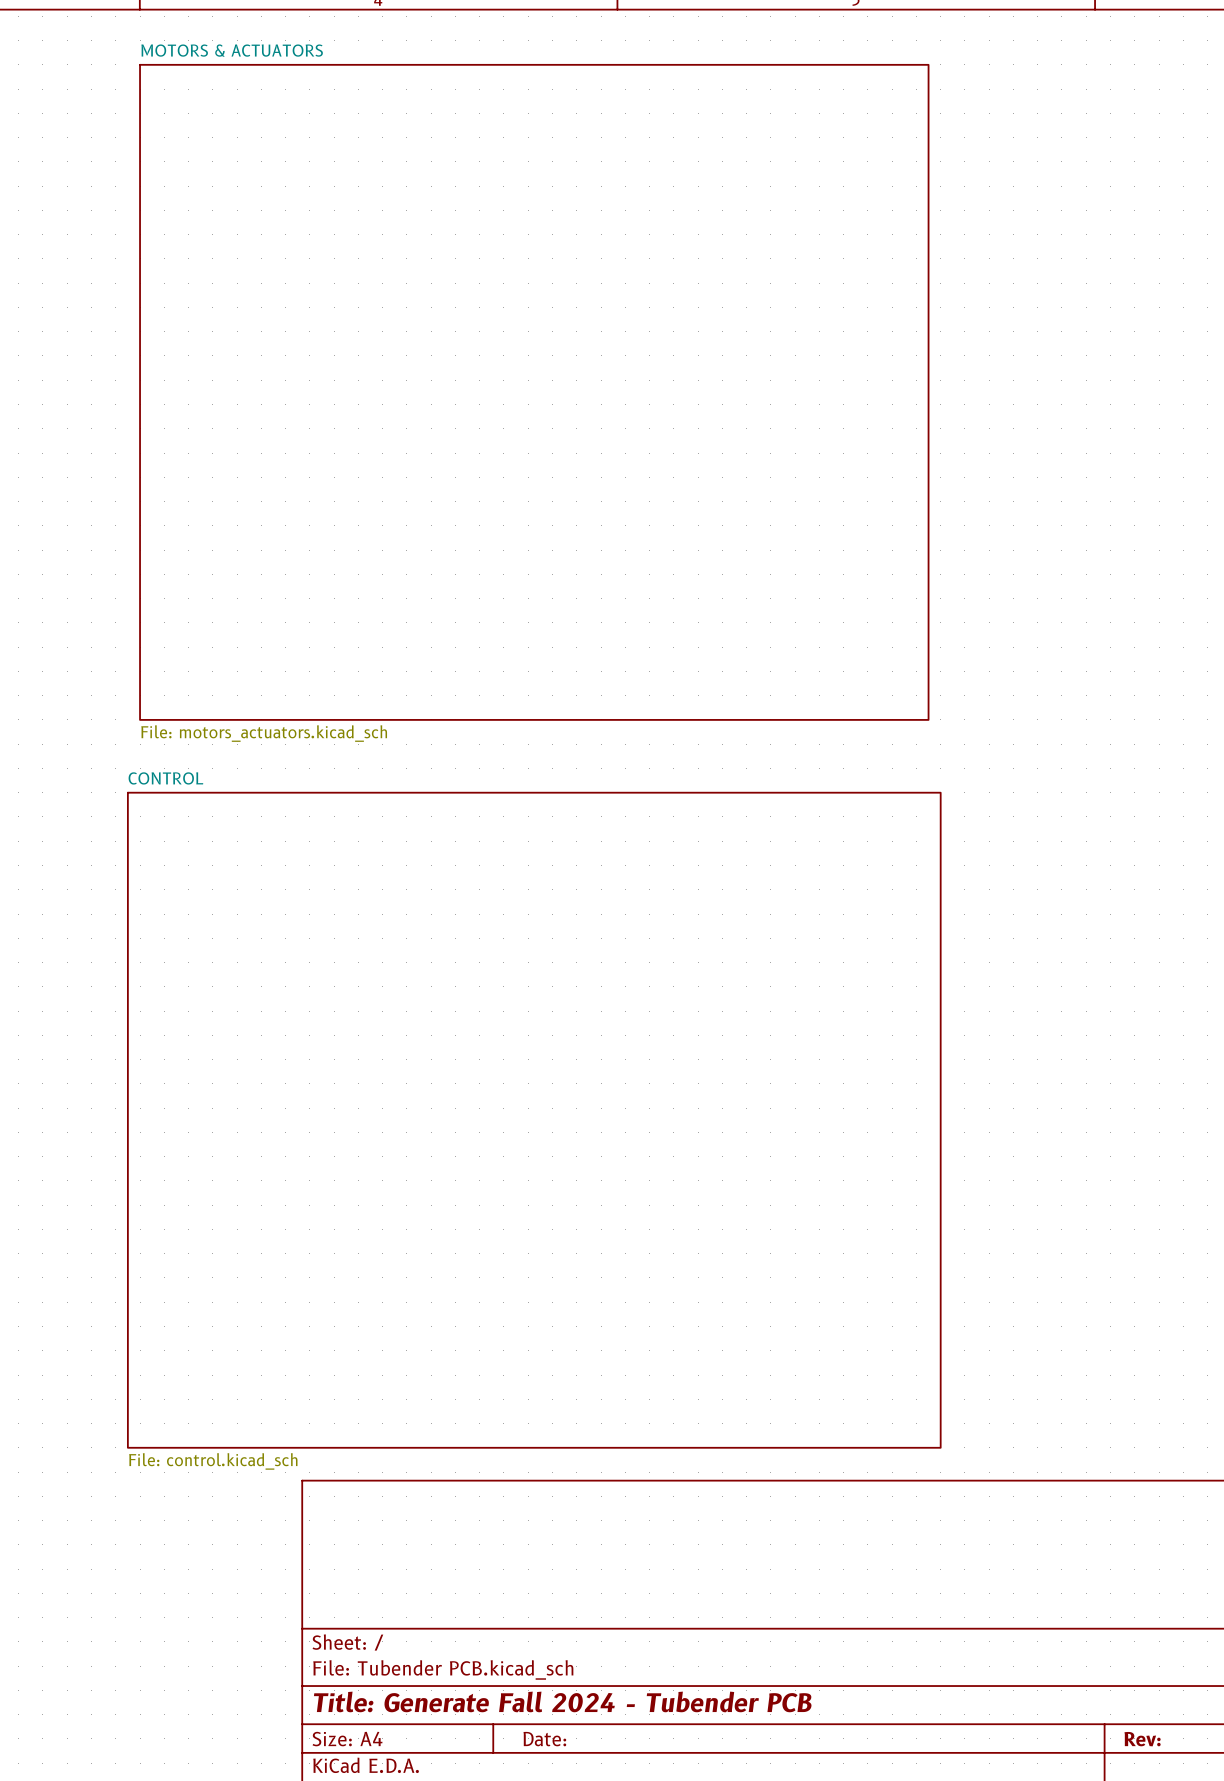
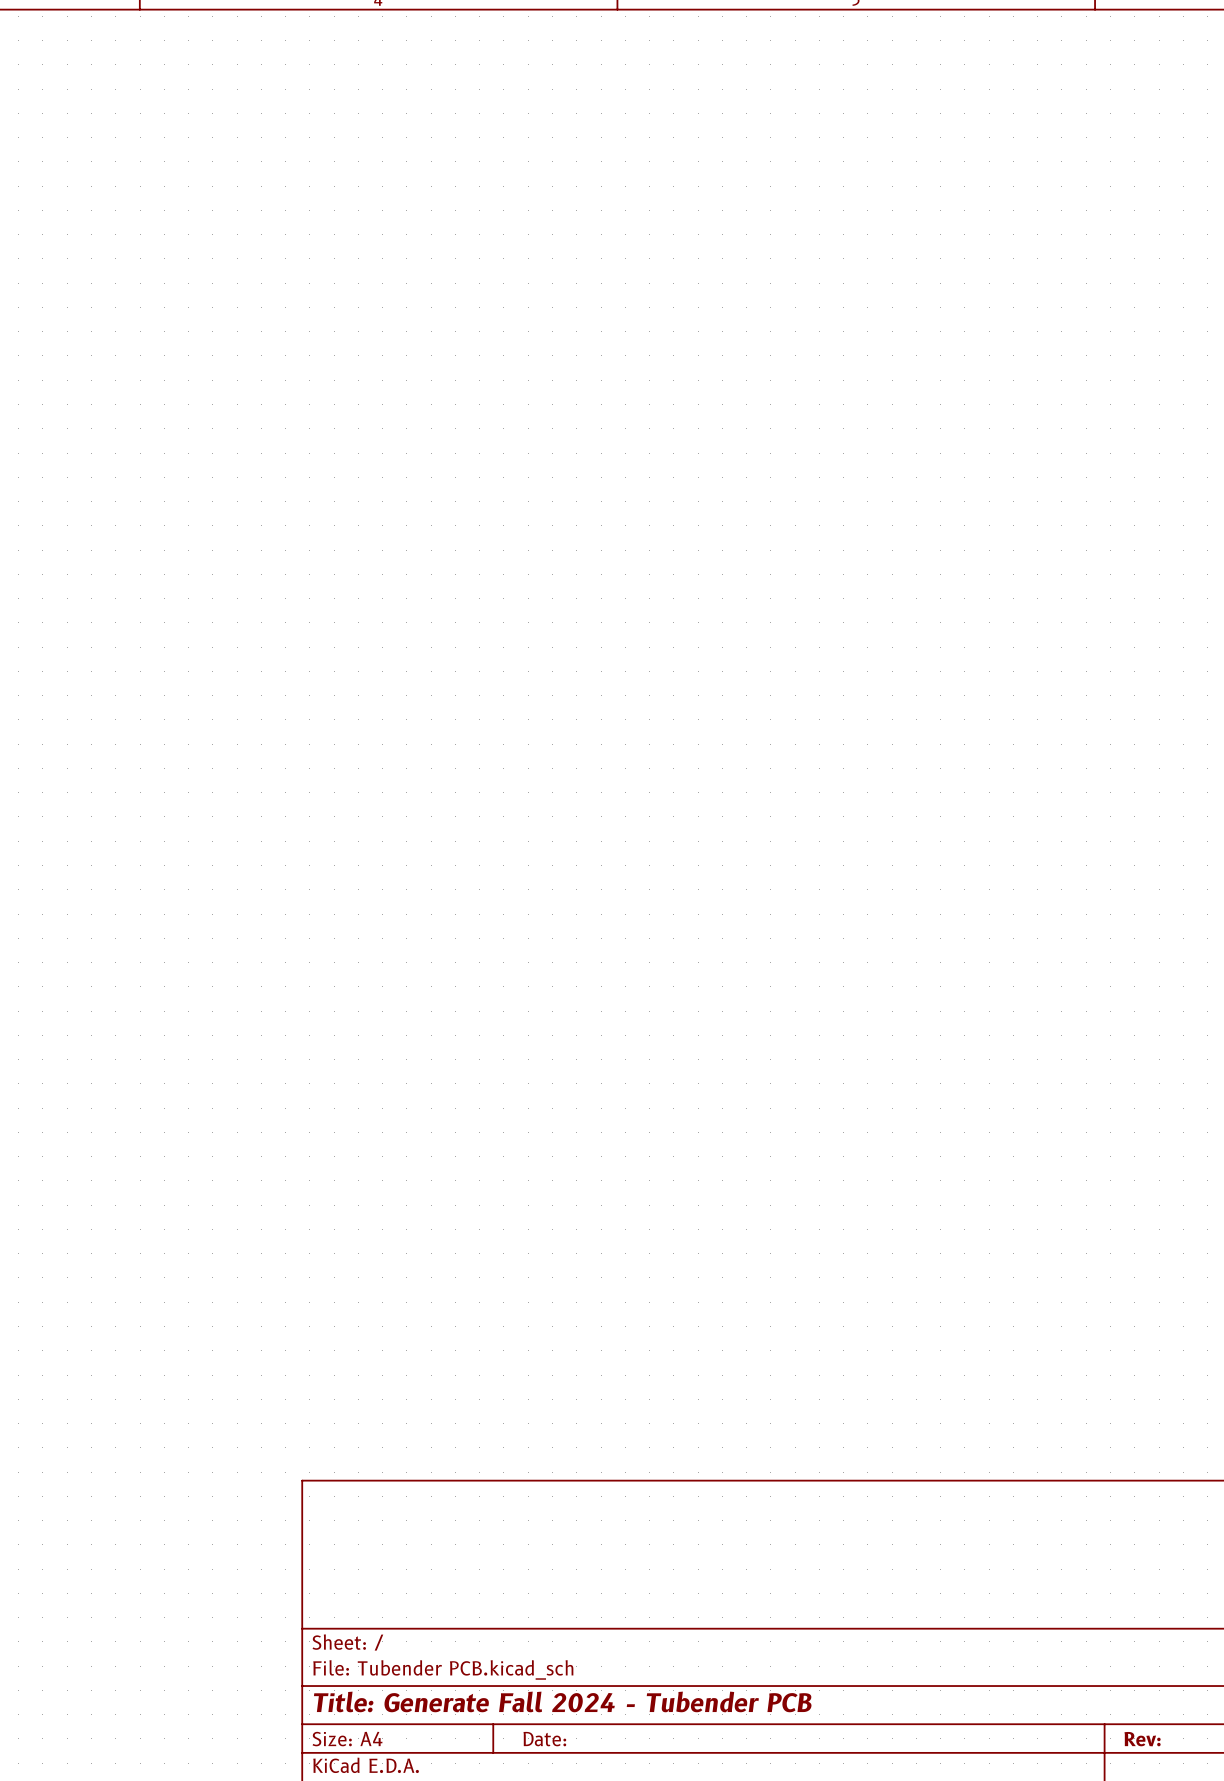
sheet MOTORS & ACTUATORS: File: motors_actuators.kicad_sch (534, 392) -> none
sheet CONTROL: File: control.kicad_sch (534, 1120) -> none

